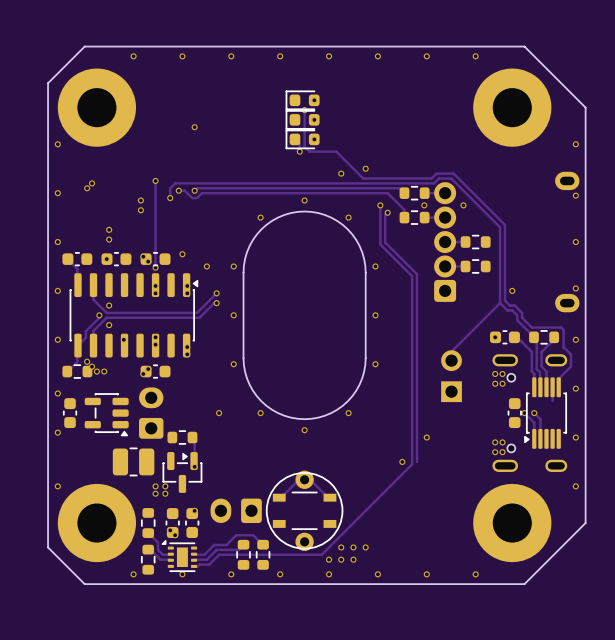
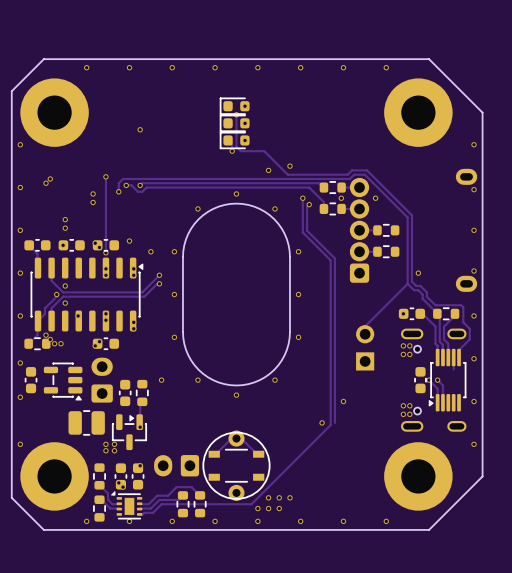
part: none -> (125, 392)
part rotation: 0° (182, 437) -> 90° clockwise (142, 392)

